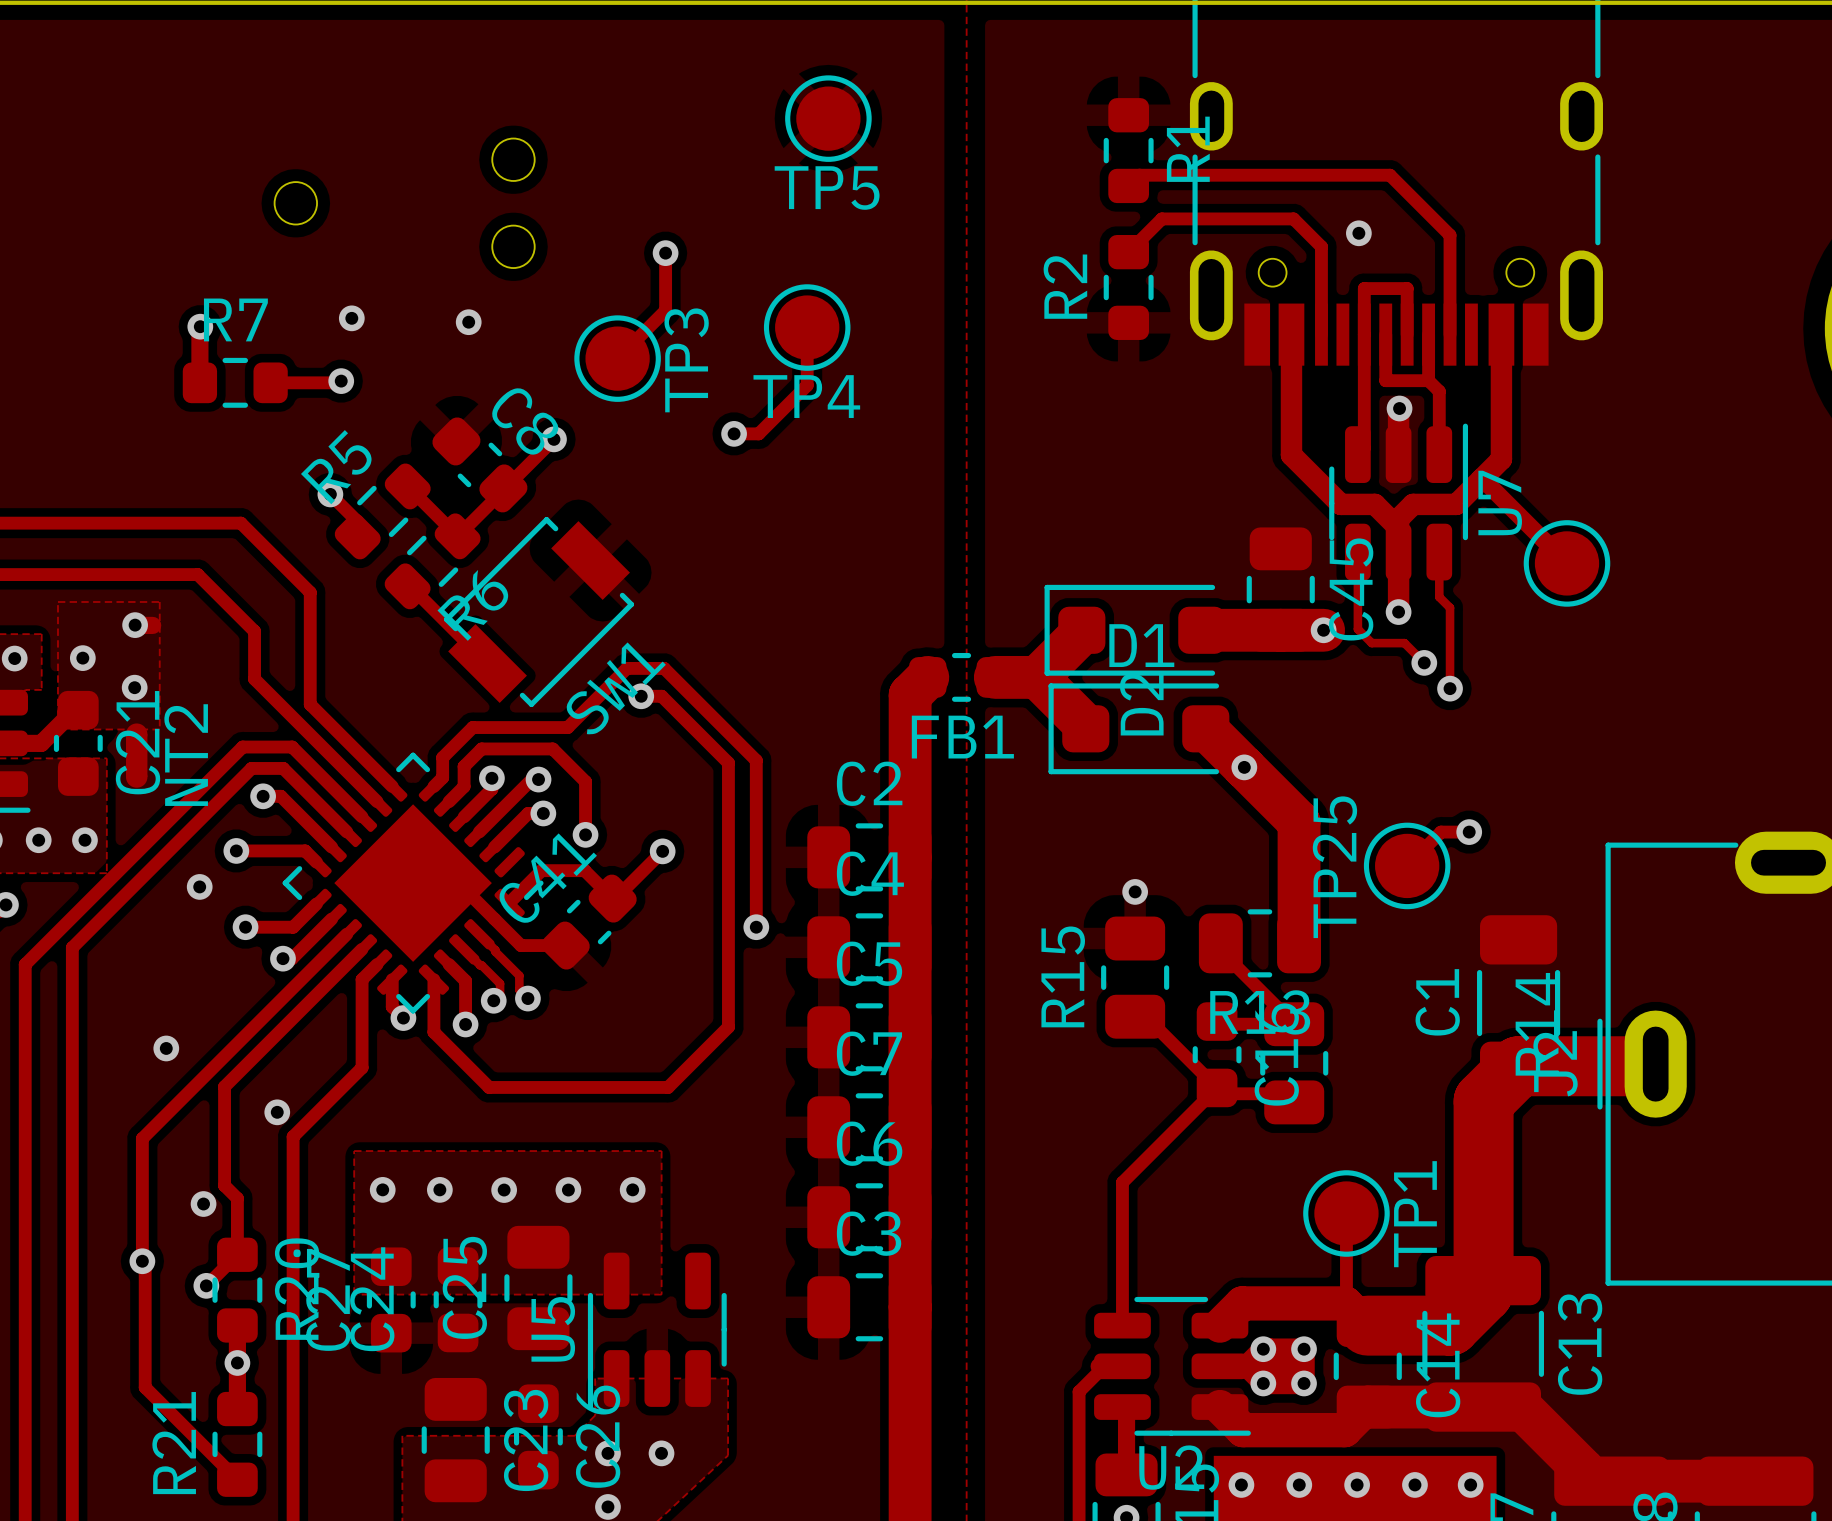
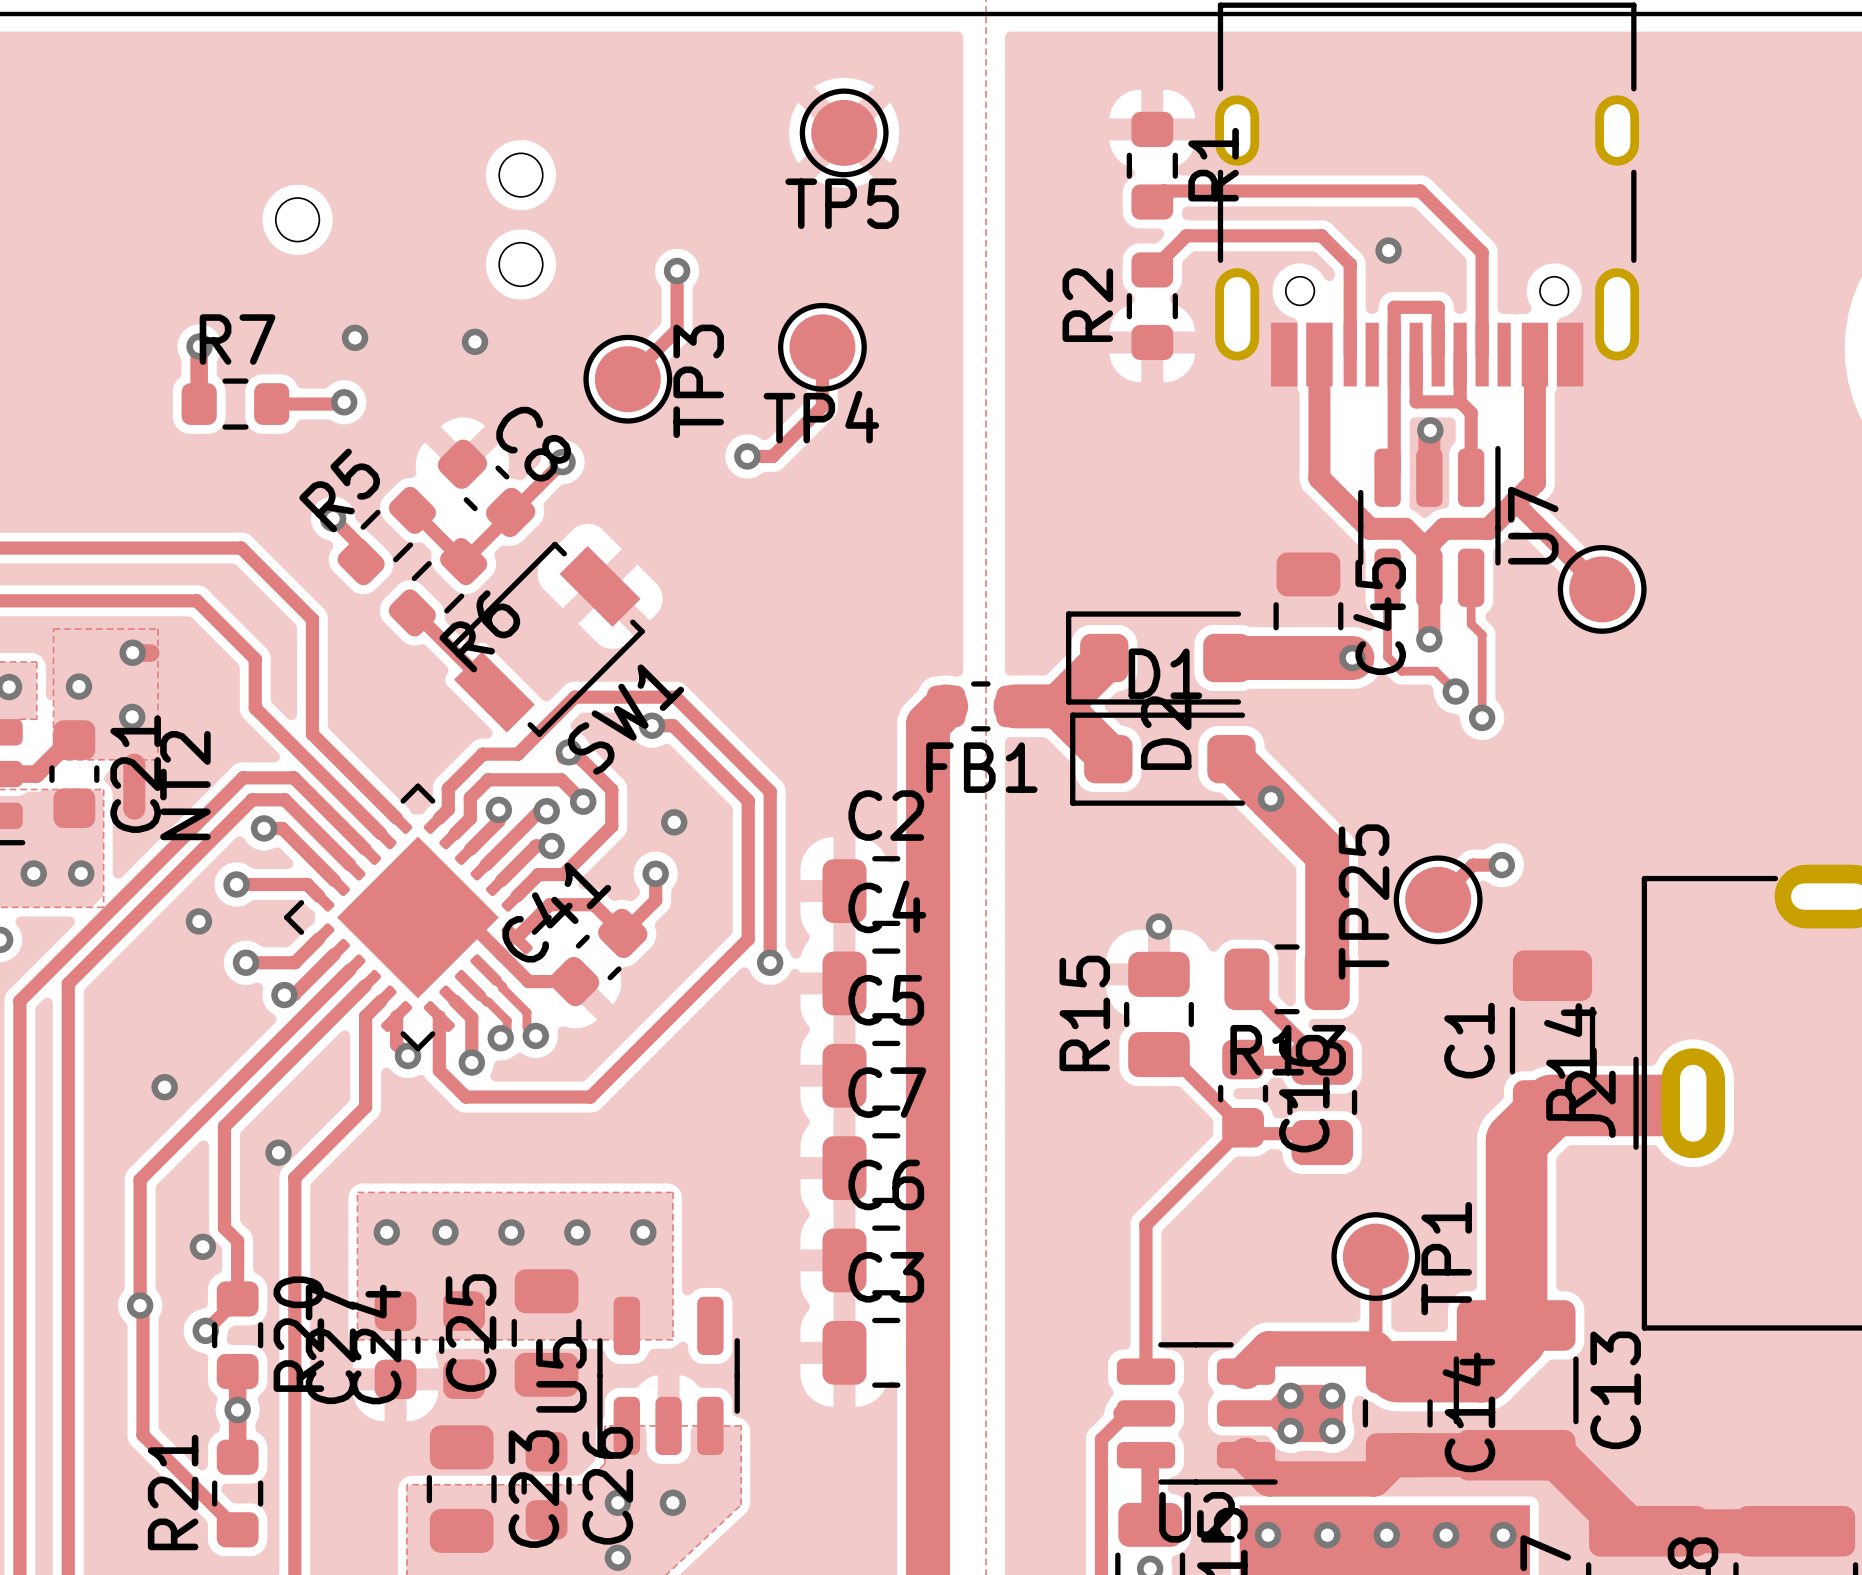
track: (626, 668) (567, 727) -> (517, 896) (538, 874) (563, 874) (611, 826) (611, 789) (579, 757) (576, 757)
via: none -> (568, 752)
track: (472, 727) (554, 727) -> (479, 757) (482, 754) (517, 754) (574, 697) (637, 697)
track: (728, 762) (728, 1027) (668, 1087) (489, 1087) (459, 1058) -> (741, 794) (748, 800) (748, 939) (590, 1097) (465, 1097)
track: (574, 770) (585, 781) (585, 834) -> none
via: none -> (583, 801)
via: none -> (674, 822)
via: (585, 834) -> none
track: (662, 851) (615, 898) (612, 898) -> (655, 873) (655, 900) (622, 933)
via position: (662, 851) -> (655, 873)

